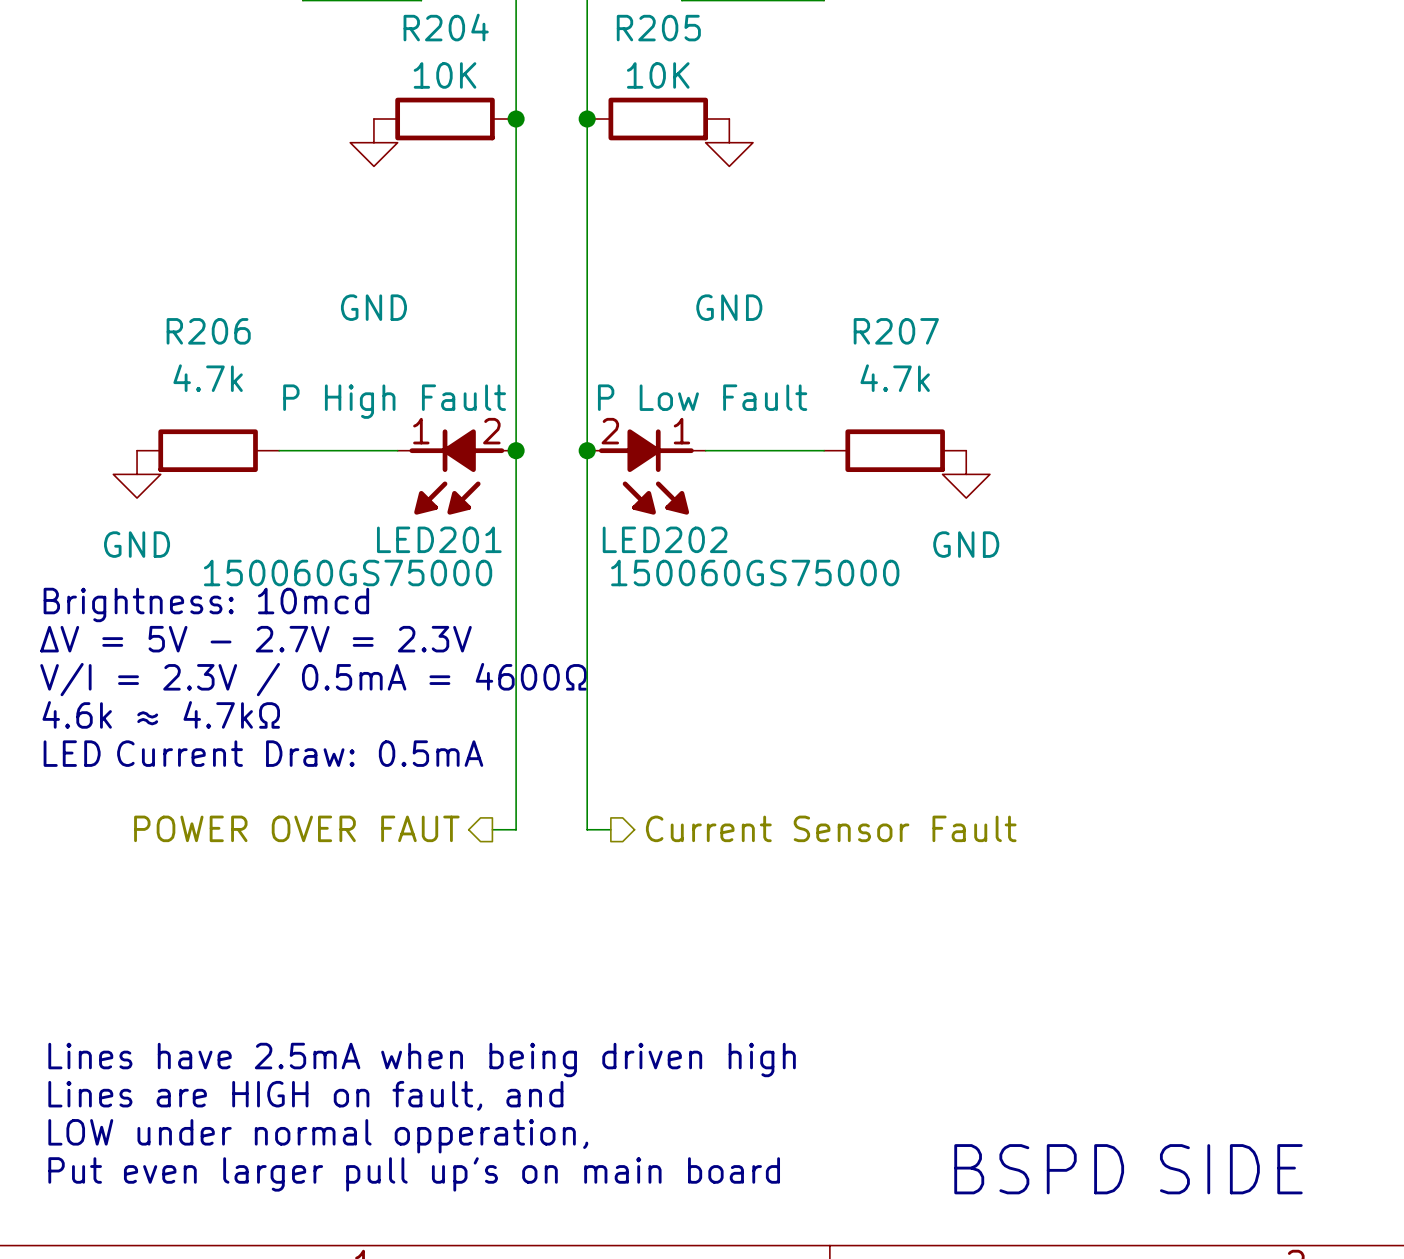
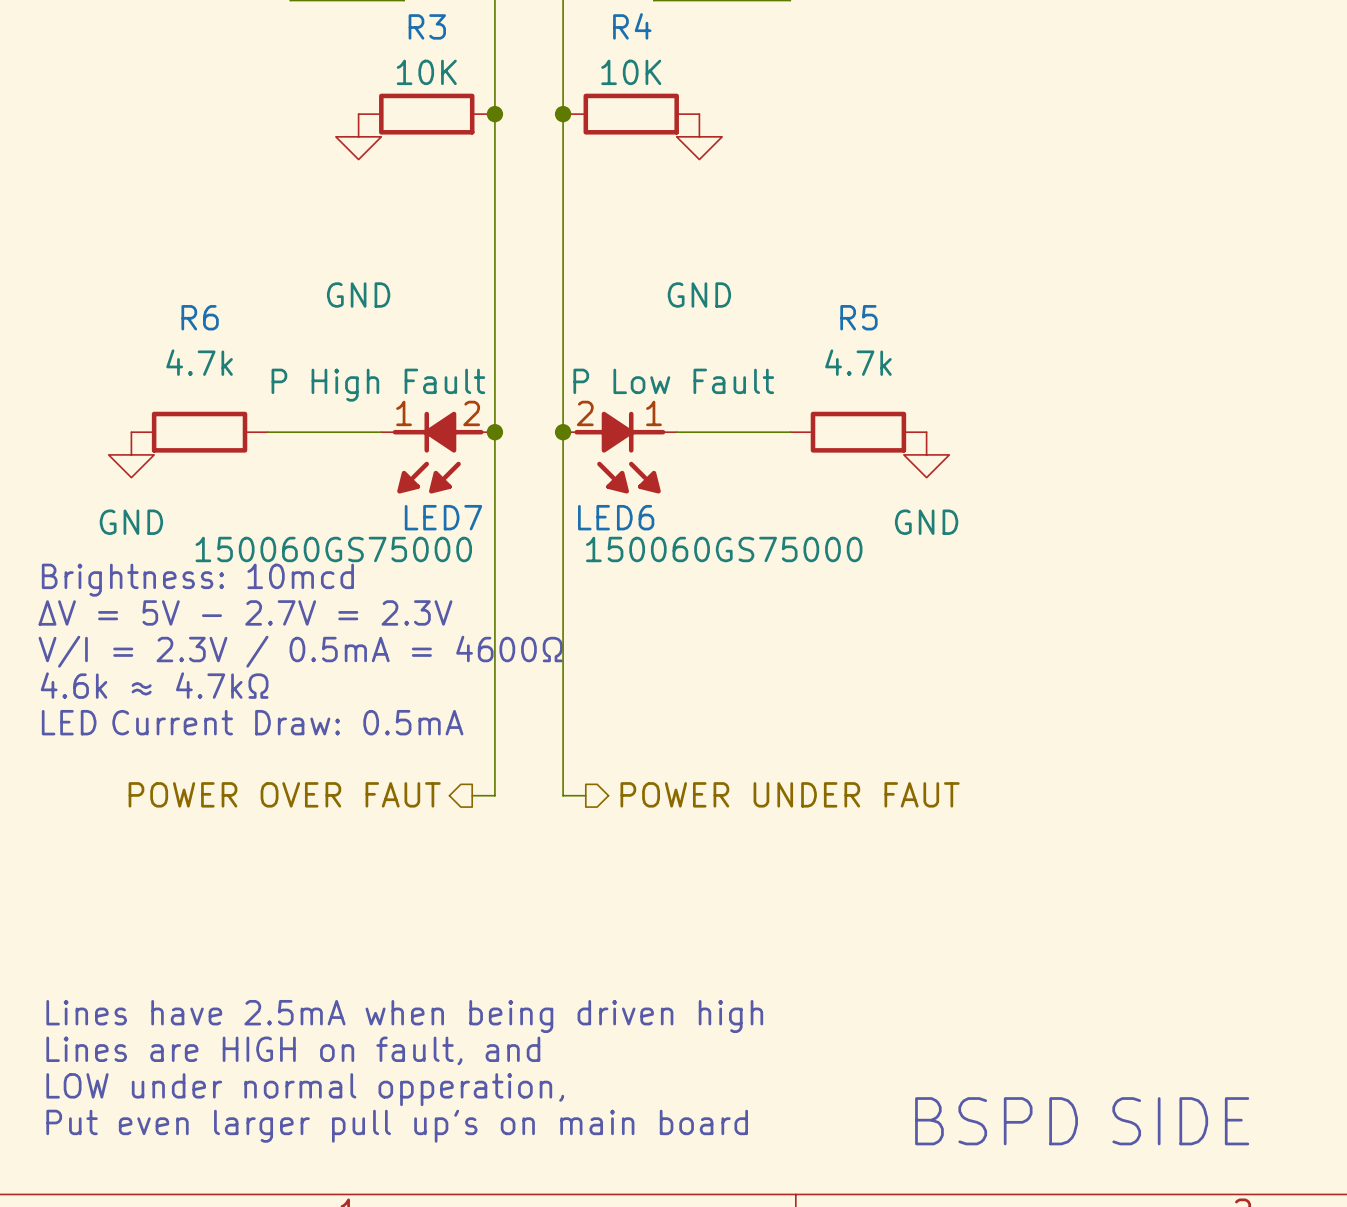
R204 name: R204 (446, 27) -> R3 (427, 26)
R205 name: R205 (658, 28) -> R4 (632, 26)
R206 name: R206 (208, 331) -> R6 (200, 317)
R207 name: R207 (896, 331) -> R5 (858, 317)
LED201 name: LED201 (439, 539) -> LED7 (443, 517)
LED202 name: LED202 (665, 539) -> LED6 (616, 517)
hierarchical label: Current Sensor Fault (831, 828) -> POWER UNDER FAUT (790, 794)

